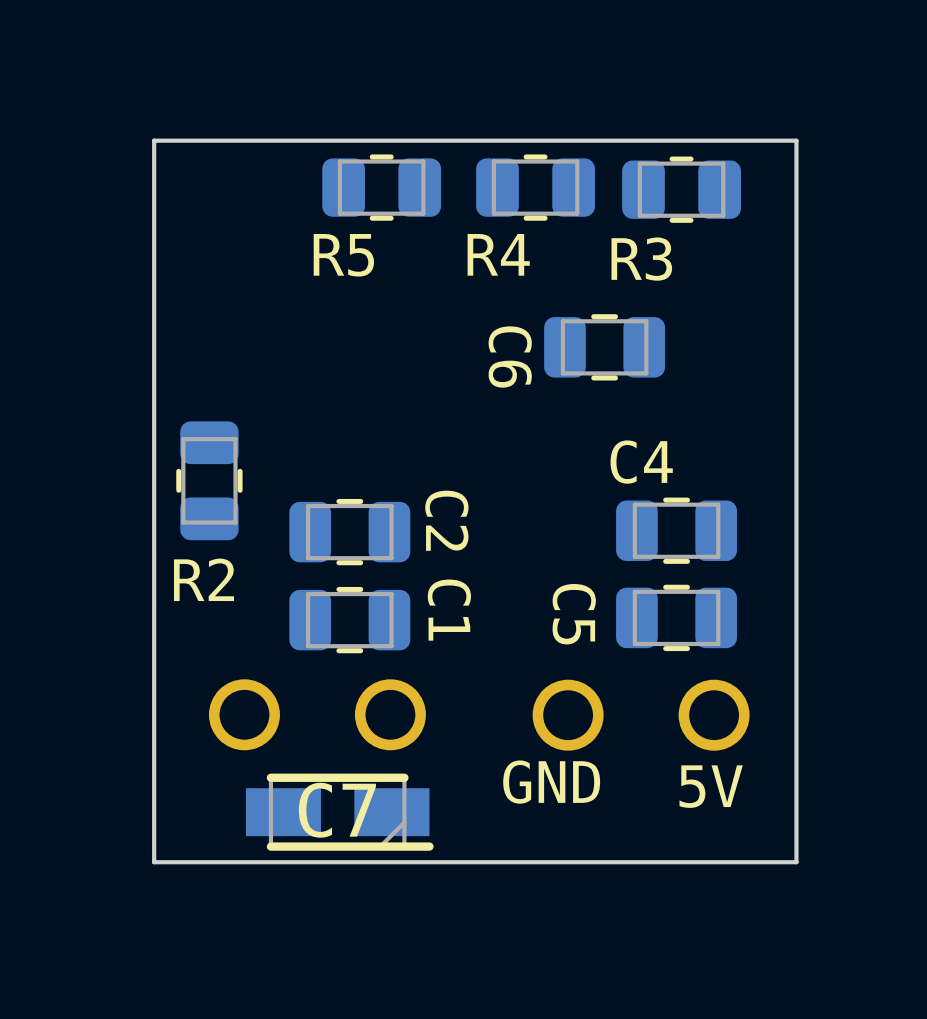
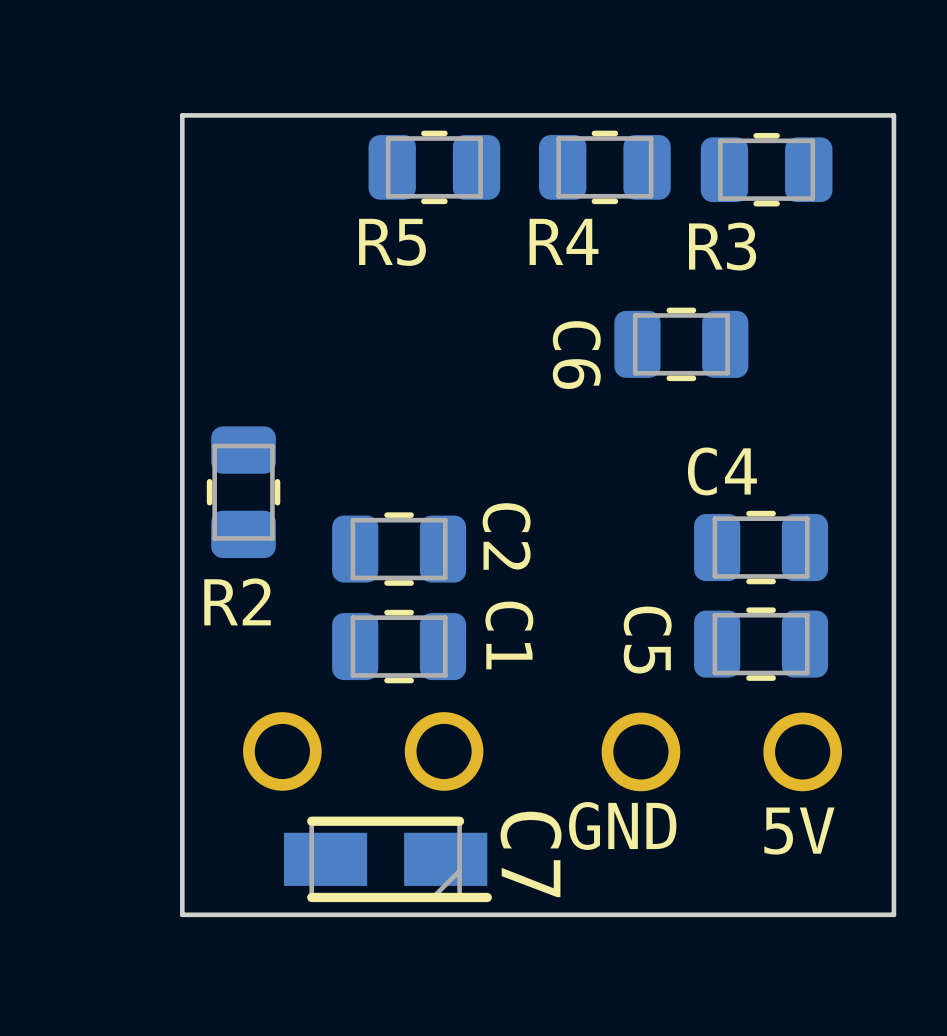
C7 name rotation: 0° (337, 810) -> 90° clockwise (531, 854)

